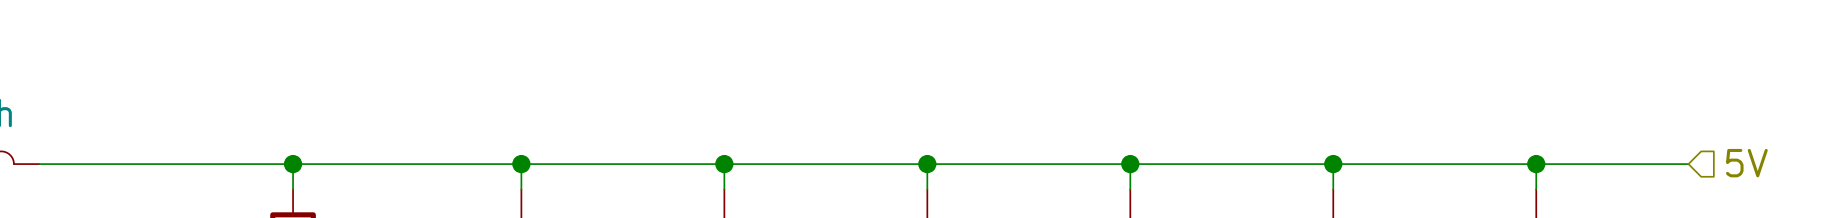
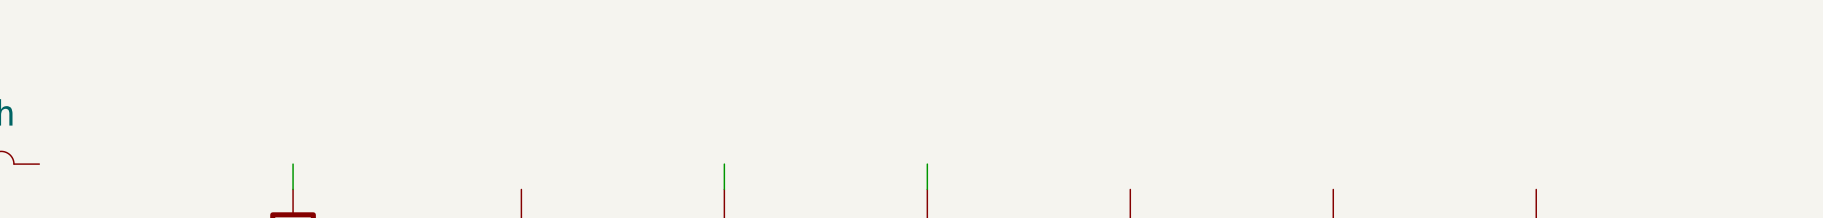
hierarchical label: 5V (1746, 163) -> none
wire: (39, 164) (1688, 164) -> none
junction: (293, 164) -> none
wire: (521, 164) (521, 189) -> none
junction: (521, 164) -> none
junction: (724, 164) -> none
junction: (927, 164) -> none
wire: (1130, 164) (1130, 189) -> none
junction: (1130, 164) -> none
wire: (1333, 164) (1333, 189) -> none
junction: (1333, 164) -> none
wire: (1536, 164) (1536, 189) -> none
junction: (1536, 164) -> none

